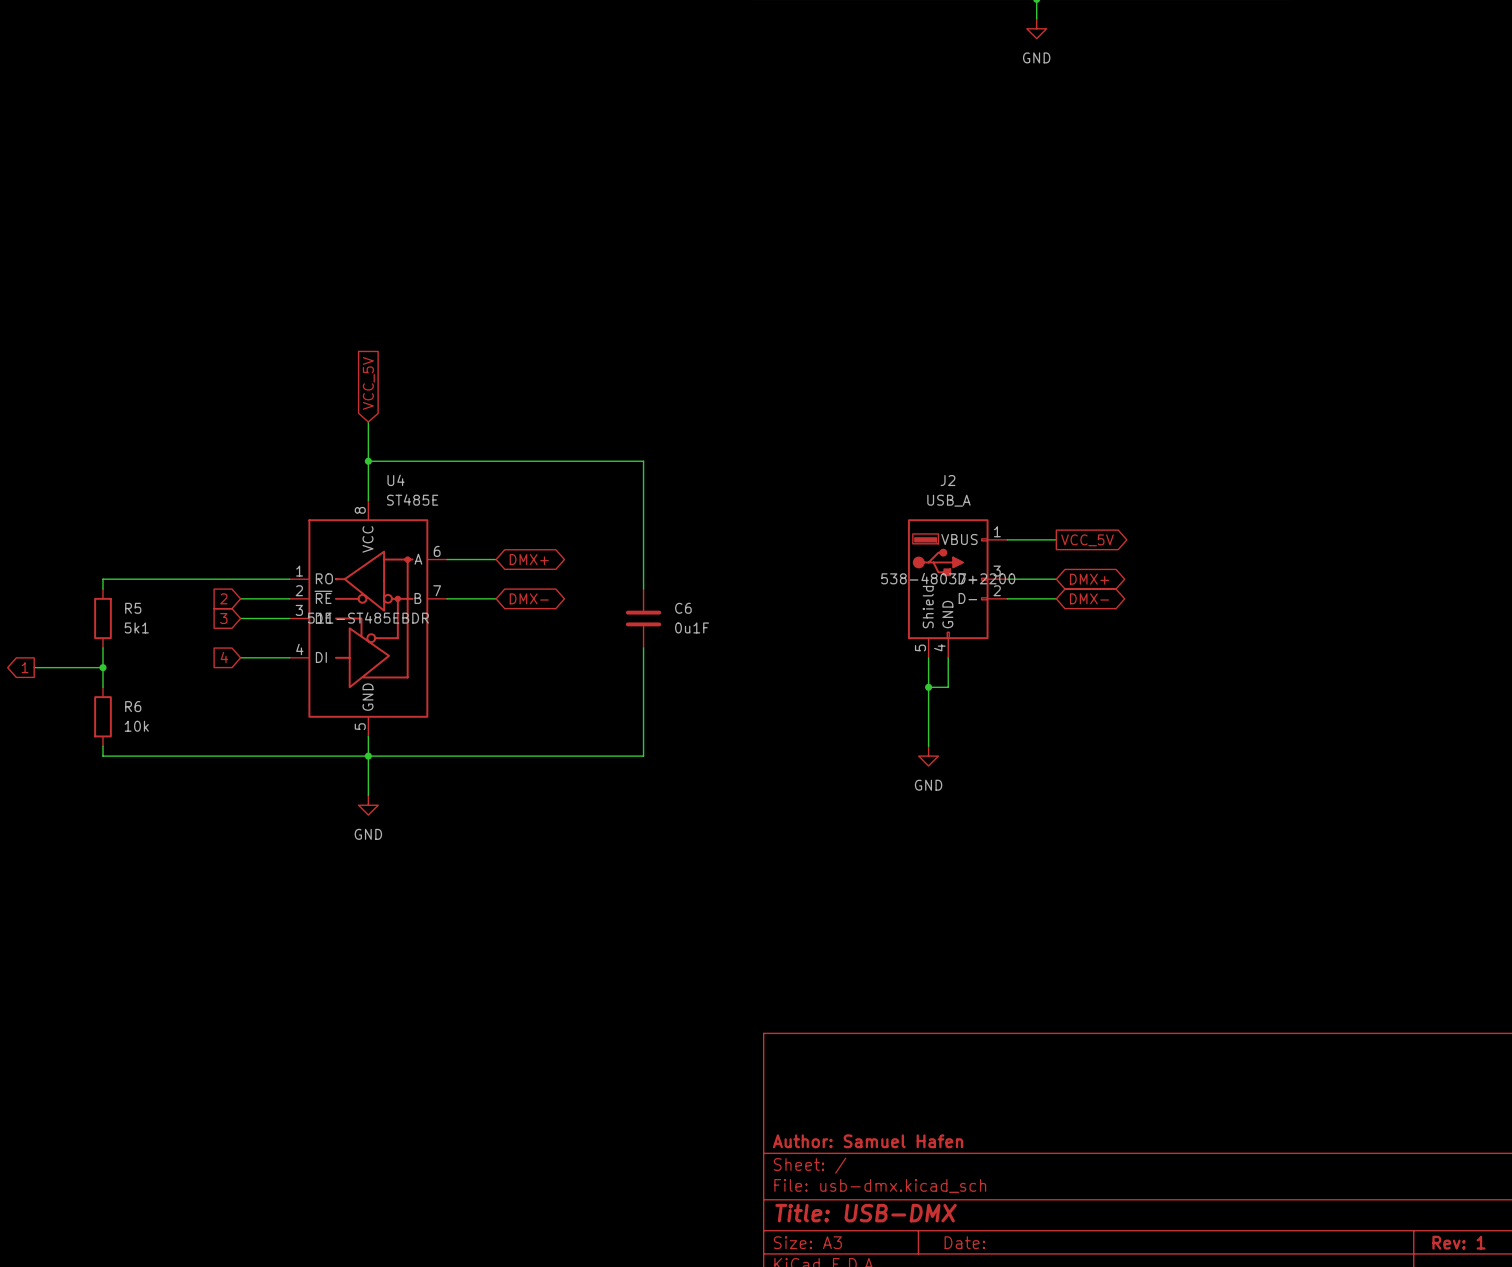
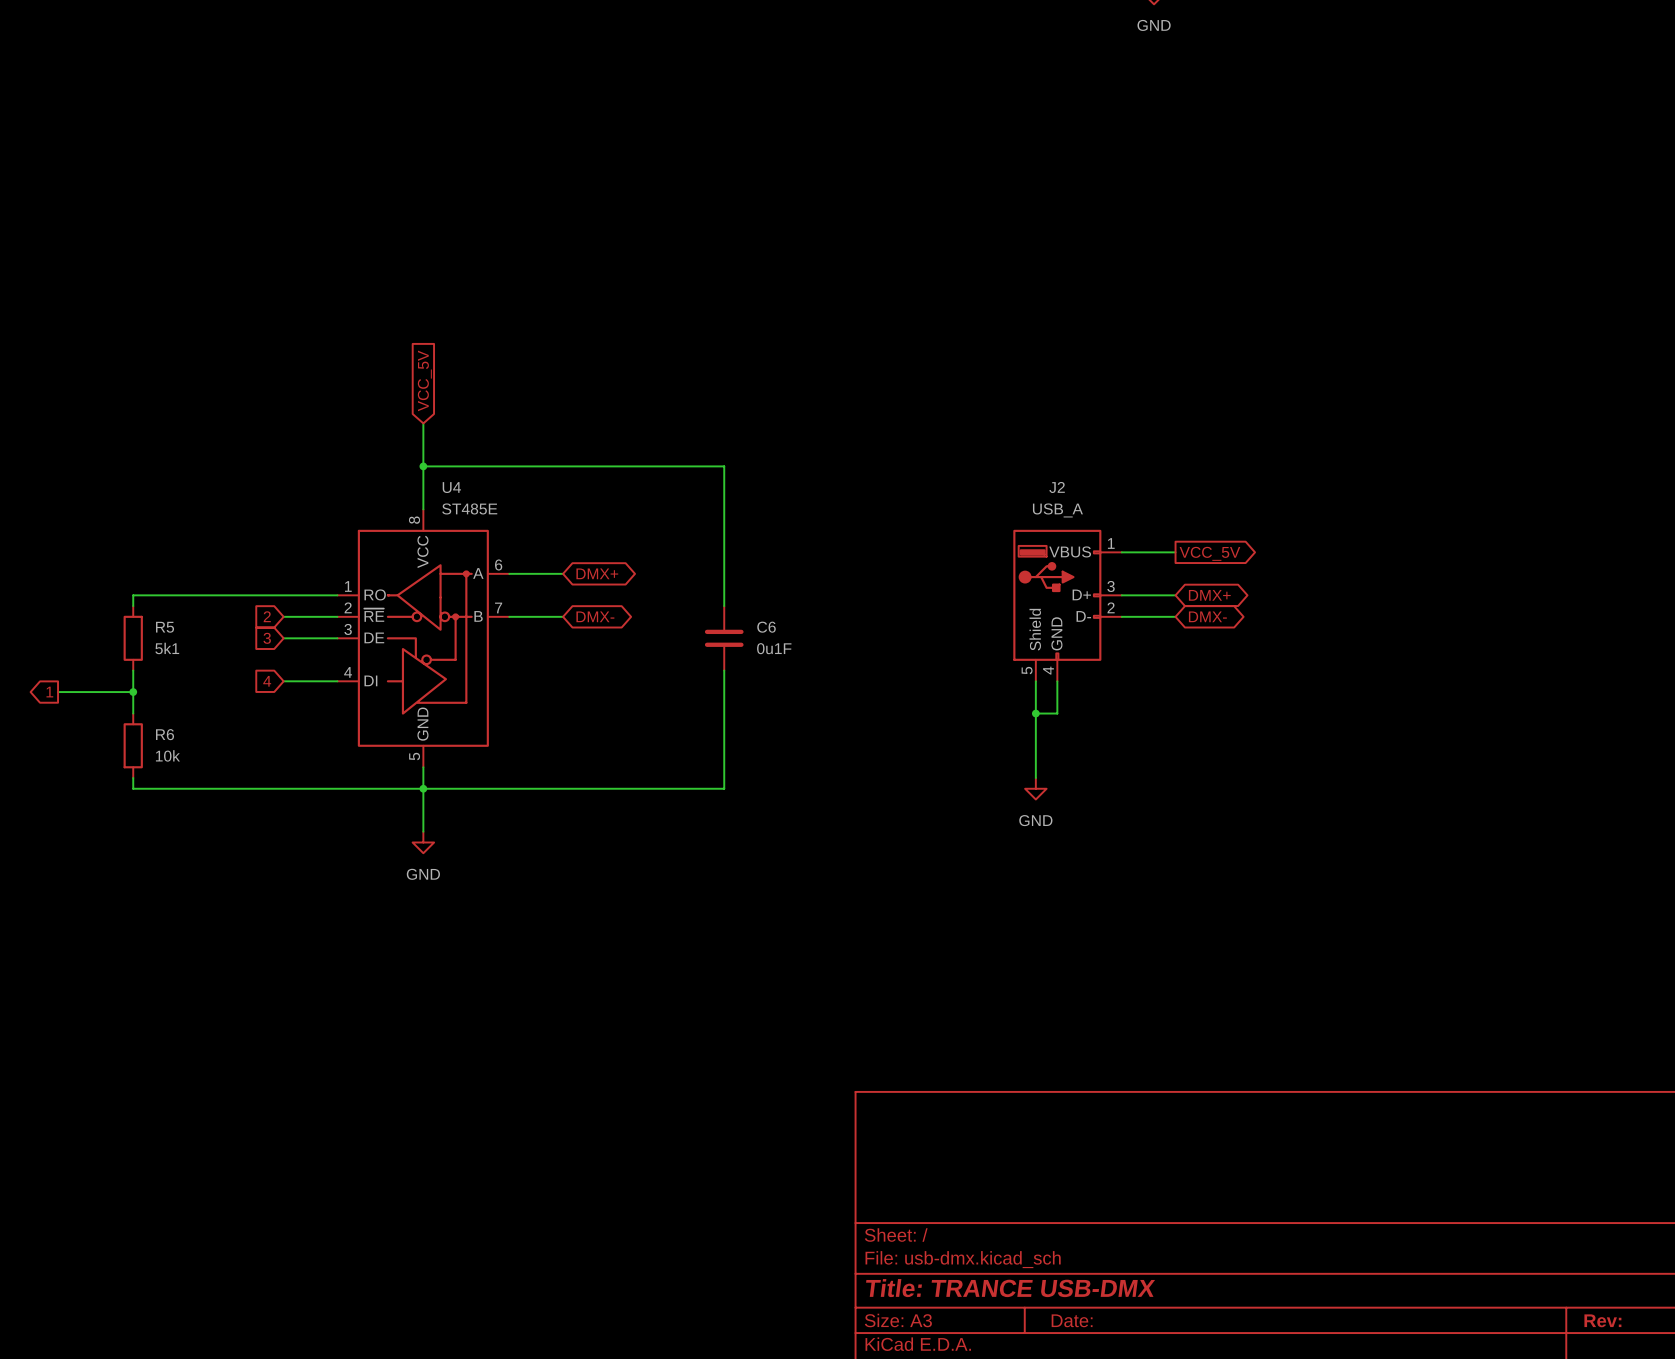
J2 text: 538-48037-2200 (948, 578) -> none
U4 text: 511-ST485EBDR (368, 617) -> none
title block: Author: Samuel Hafen (868, 1141) -> none
title block: Title: USB-DMX (866, 1213) -> Title: TRANCE USB-DMX (1010, 1288)
title block: Rev: 1 (1458, 1242) -> Rev: (1602, 1320)

